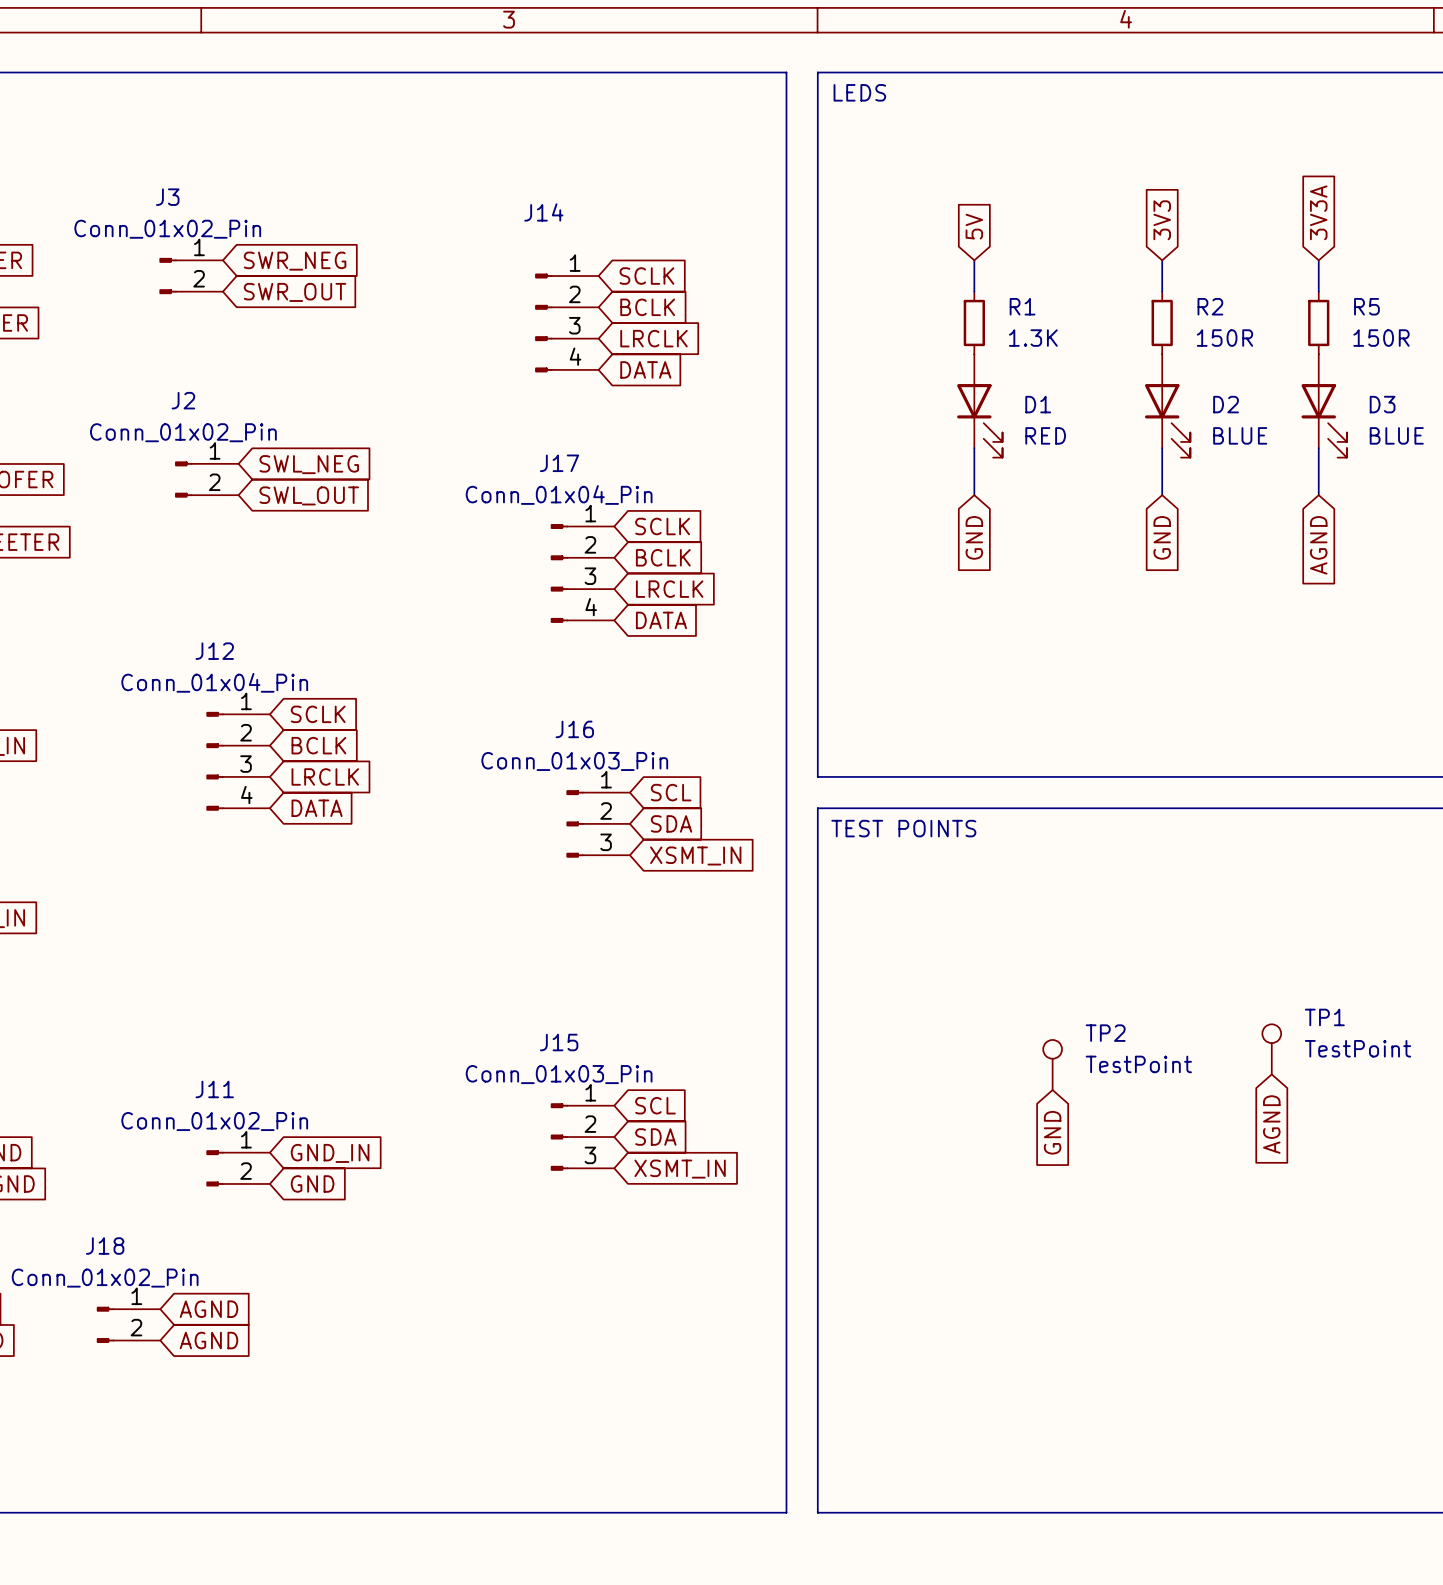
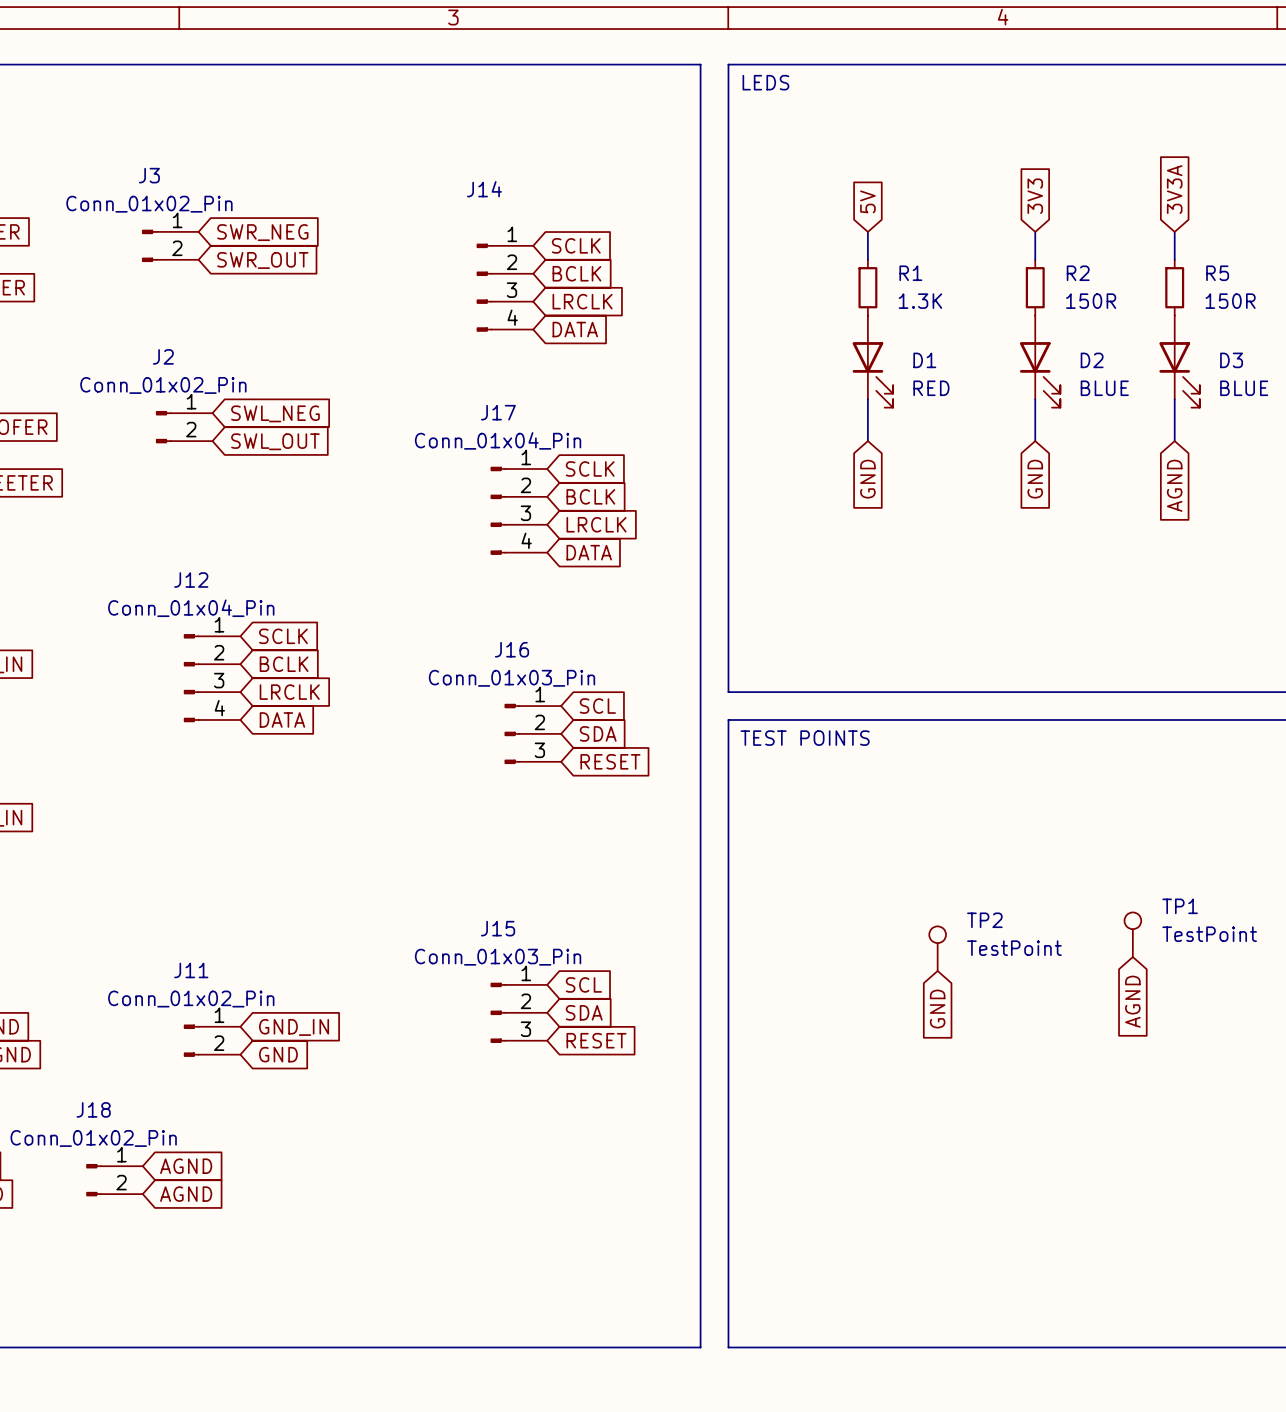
global label: XSMT_IN (695, 855) -> RESET (610, 761)
global label: XSMT_IN (680, 1169) -> RESET (596, 1040)

